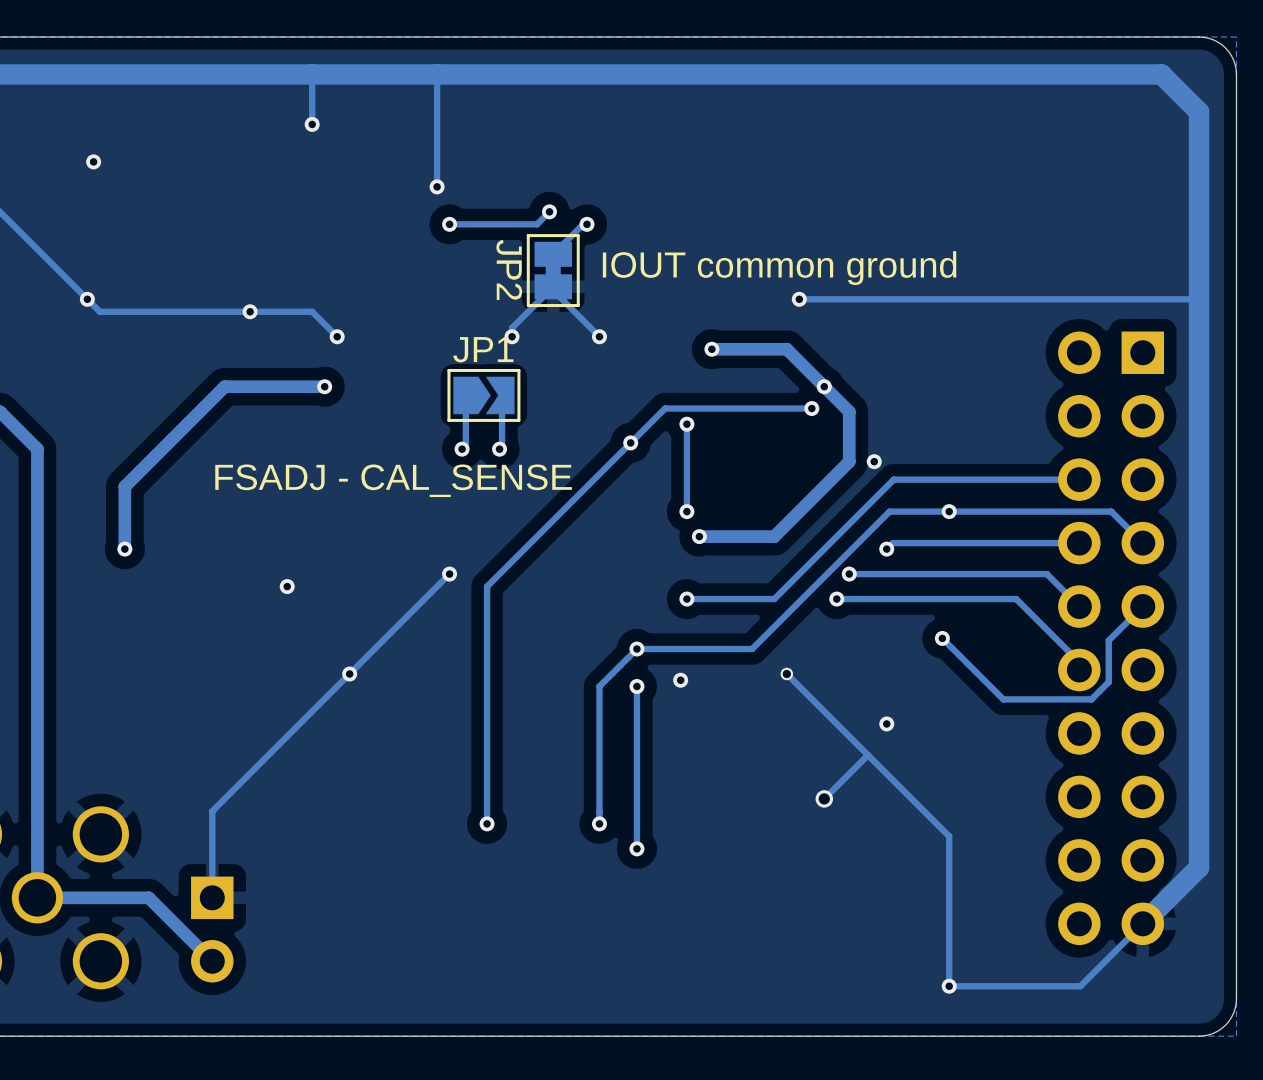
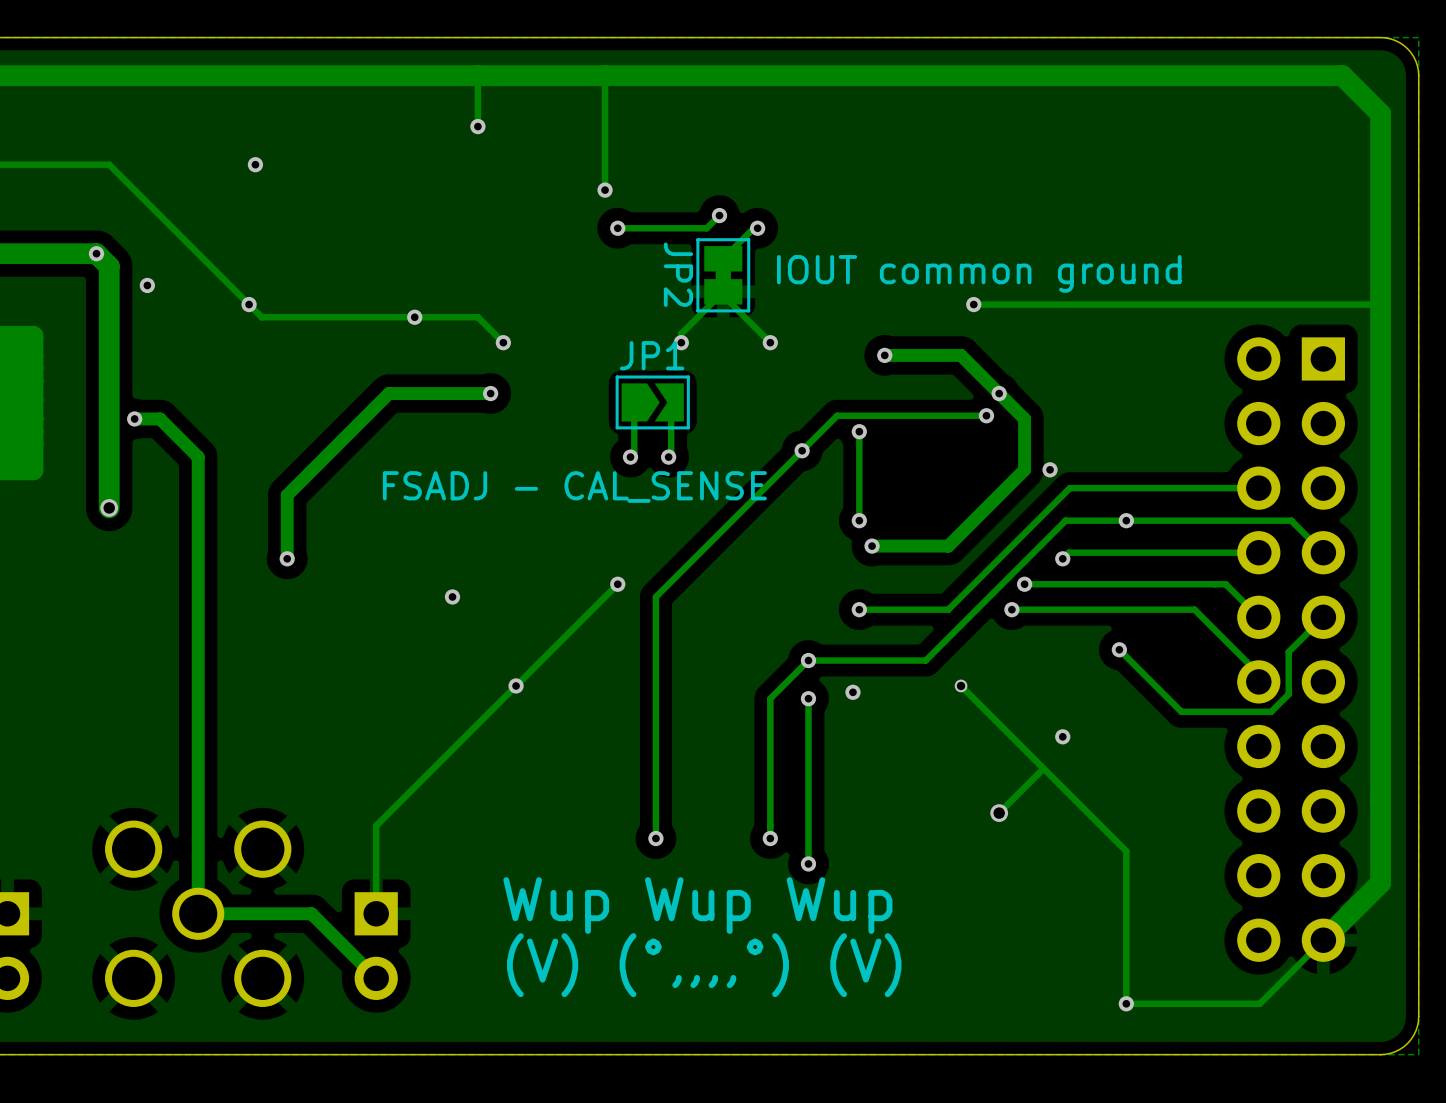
text: none -> Wup Wup Wup (697, 905)
text: none -> (V) (°,,,,°) (V) (704, 965)

